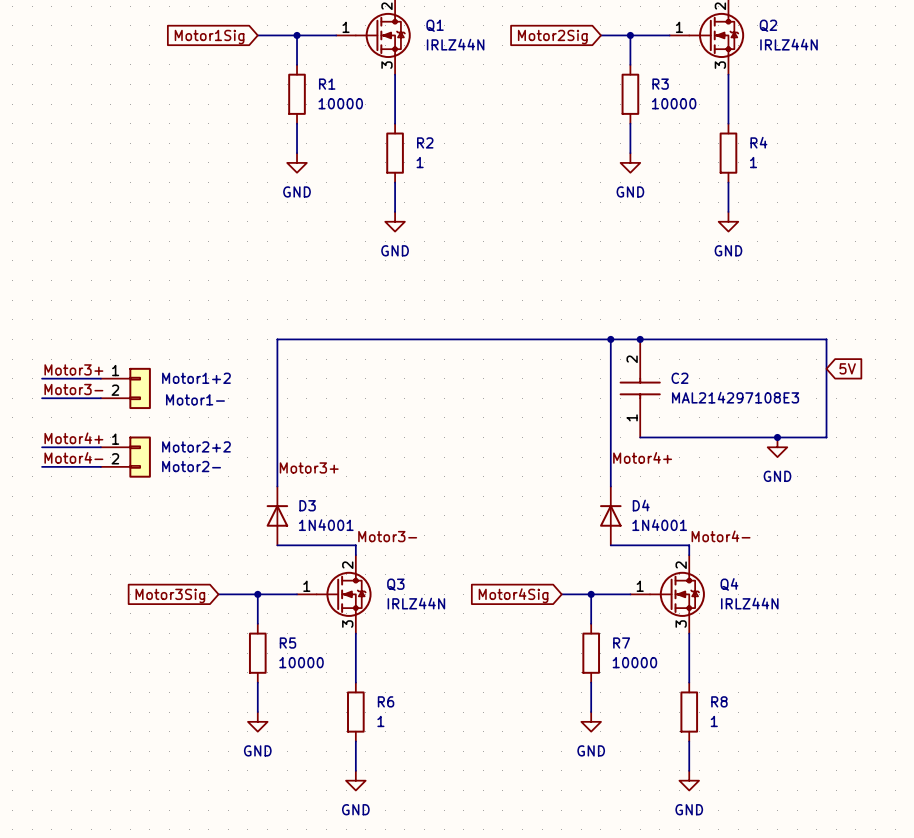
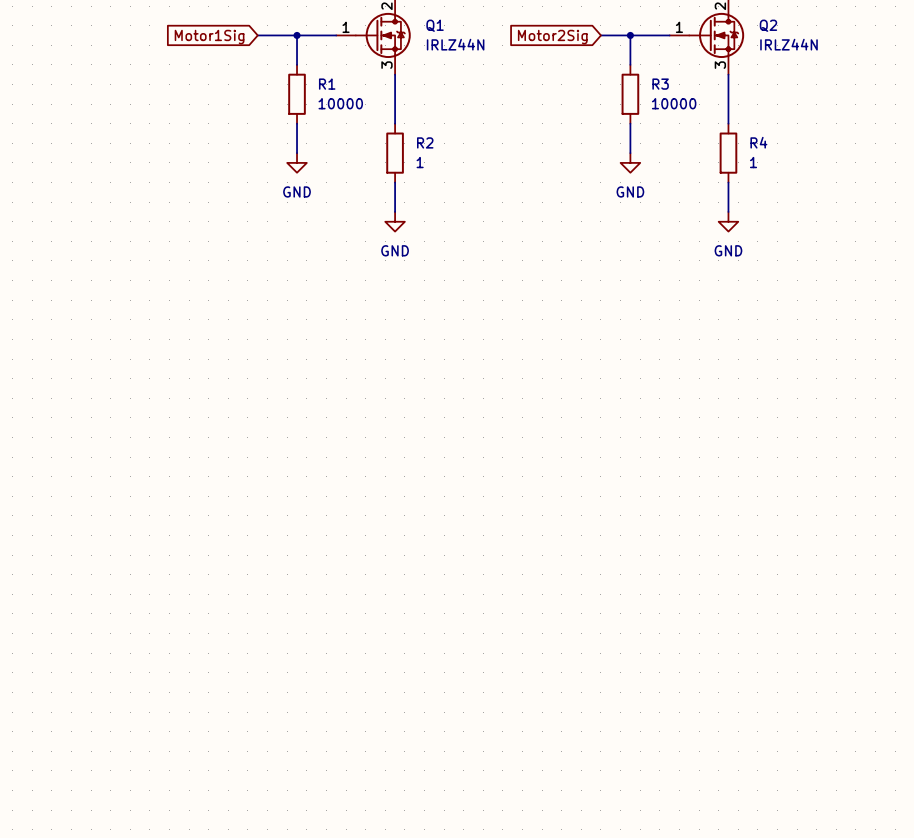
wire: (610, 339) (610, 486) -> none
junction: (610, 339) -> none
junction: (640, 339) -> none
global label: 5V (847, 368) -> none
label: Motor3+ (73, 369) -> none
wire: (42, 378) (100, 378) -> none
Motor1+2: Motor1- (125, 388) -> none
C2: MAL214297108E3 (640, 388) -> none
label: Motor3- (73, 389) -> none
wire: (42, 398) (100, 398) -> none
wire: (640, 437) (826, 437) (826, 339) (277, 339) (277, 486) -> none
junction: (777, 437) -> none
label: Motor4+ (73, 438) -> none
wire: (42, 447) (100, 447) -> none
power symbol: GND (777, 447) -> none
label: Motor4- (73, 457) -> none
Motor2+2: Motor2- (125, 457) -> none
label: Motor4+ (642, 457) -> none
wire: (42, 466) (100, 466) -> none
label: Motor3+ (309, 467) -> none
D3: 1N4001 (277, 515) -> none
D4: 1N4001 (610, 515) -> none
label: Motor3- (387, 536) -> none
label: Motor4- (721, 536) -> none
wire: (277, 545) (355, 545) (355, 555) -> none
wire: (610, 545) (689, 545) (689, 555) -> none
wire: (218, 594) (297, 594) -> none
wire: (257, 594) (257, 623) -> none
junction: (257, 594) -> none
Q3: IRLZ44N (334, 594) -> none
wire: (561, 594) (630, 594) -> none
wire: (591, 594) (591, 623) -> none
junction: (591, 594) -> none
Q4: IRLZ44N (667, 594) -> none
global label: Motor4Sig (513, 595) -> none
global label: Motor3Sig (170, 596) -> none
wire: (355, 633) (355, 682) -> none
wire: (689, 633) (689, 682) -> none
R5: 10000 (257, 653) -> none
R7: 10000 (591, 653) -> none
wire: (257, 682) (257, 712) -> none
wire: (591, 682) (591, 712) -> none
R6: 1 (355, 712) -> none
R8: 1 (689, 712) -> none
power symbol: GND (257, 721) -> none
power symbol: GND (591, 721) -> none
wire: (355, 741) (355, 770) -> none
wire: (689, 741) (689, 770) -> none
power symbol: GND (355, 780) -> none
power symbol: GND (689, 780) -> none

